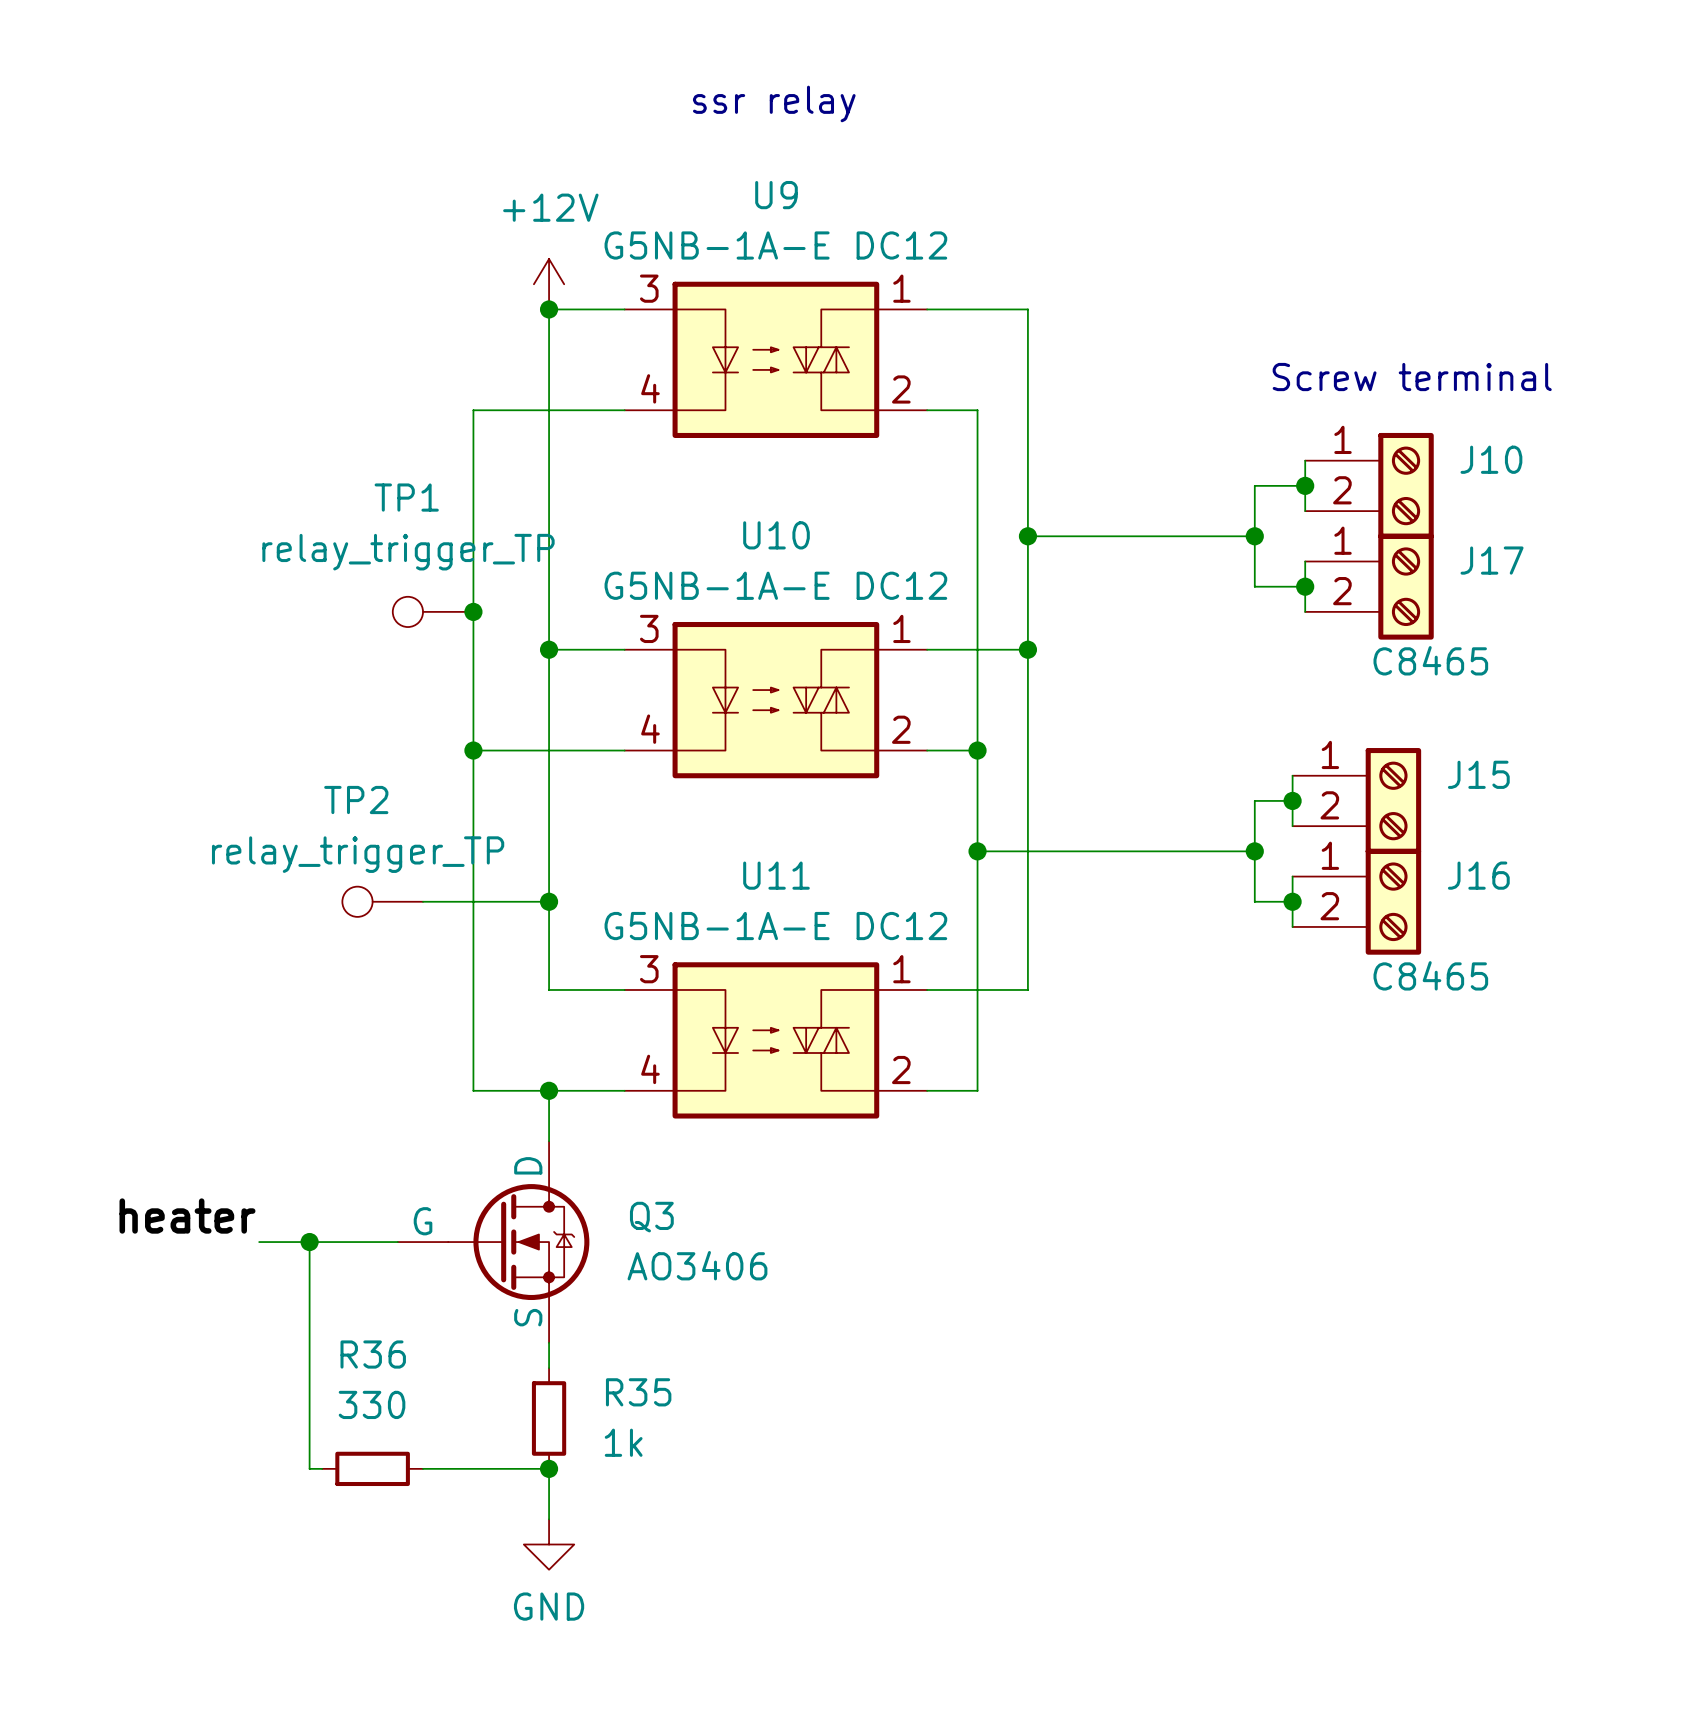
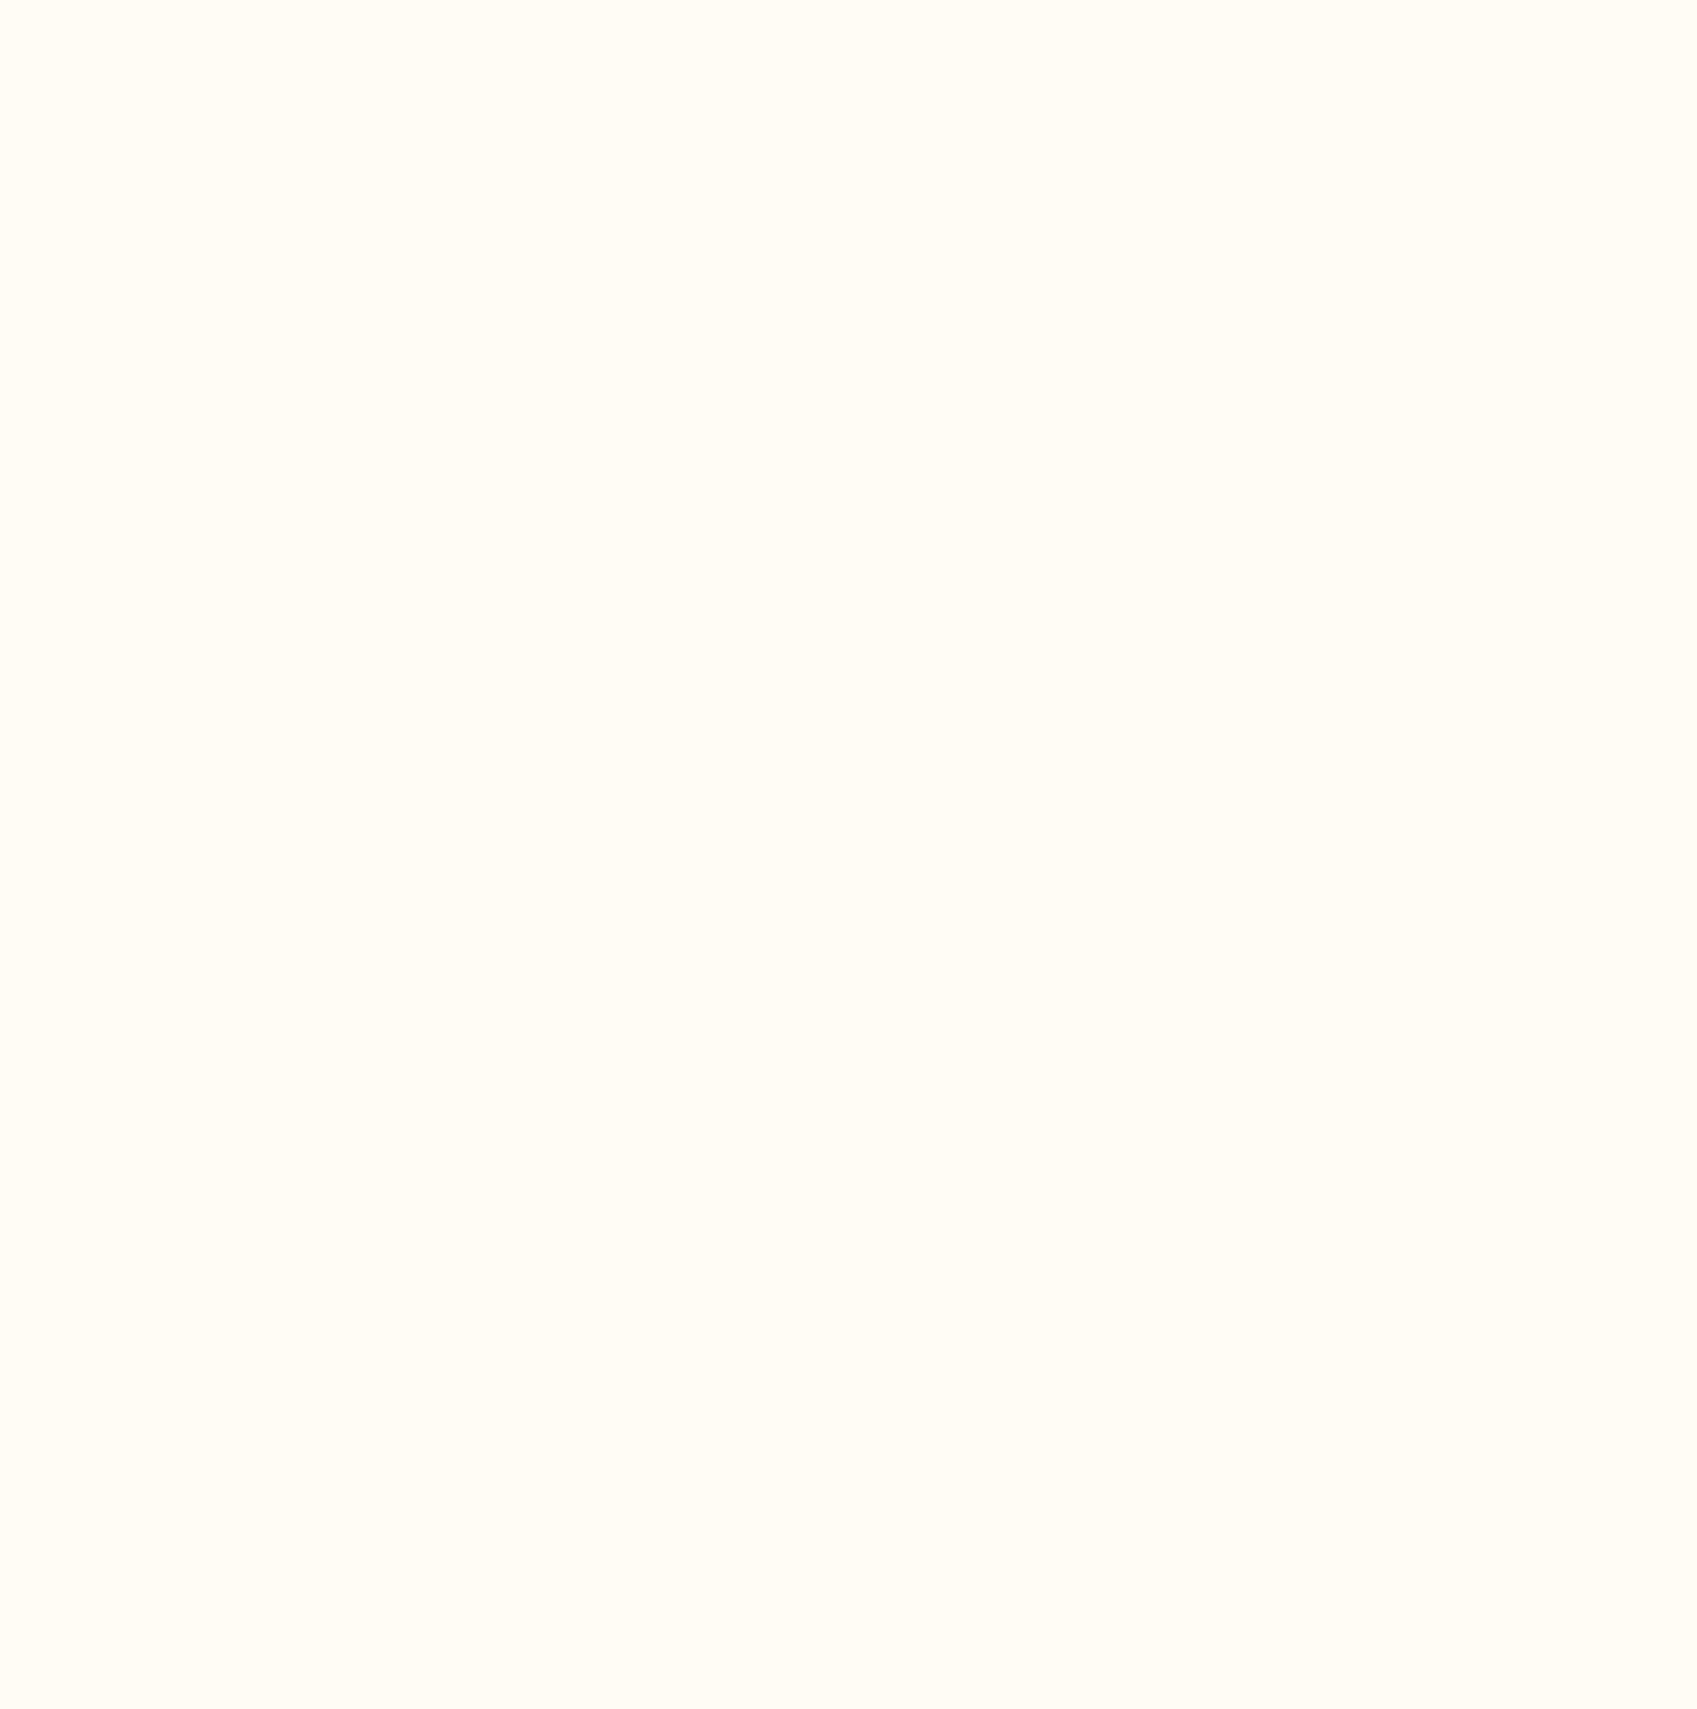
text: ssr relay (774, 103) -> none
power symbol: +12V (549, 284) -> none
junction: (549, 309) -> none
wire: (624, 309) (549, 309) (549, 989) (624, 989) -> none
wire: (927, 309) (1027, 309) (1027, 989) (927, 989) -> none
U9: G5NB-1A-E DC12 (775, 359) -> none
text: Screw terminal (1412, 377) -> none
wire: (624, 410) (473, 410) (473, 1090) (624, 1090) -> none
wire: (927, 410) (977, 410) (977, 1090) (927, 1090) -> none
wire: (1305, 460) (1305, 511) -> none
wire: (1305, 485) (1254, 485) (1254, 586) (1305, 586) -> none
junction: (1305, 485) -> none
J10: C8465 (1369, 485) -> none
wire: (1027, 536) (1254, 536) -> none
junction: (1027, 536) -> none
junction: (1254, 536) -> none
wire: (1305, 561) (1305, 611) -> none
junction: (1305, 586) -> none
J17: (1369, 586) -> none
TP1: relay_trigger_TP (433, 611) -> none
junction: (473, 611) -> none
wire: (549, 649) (624, 649) -> none
junction: (549, 649) -> none
wire: (927, 649) (1027, 649) -> none
junction: (1027, 649) -> none
U10: G5NB-1A-E DC12 (775, 700) -> none
wire: (473, 750) (624, 750) -> none
junction: (473, 750) -> none
wire: (927, 750) (977, 750) -> none
junction: (977, 750) -> none
wire: (1292, 775) (1292, 826) -> none
wire: (1292, 800) (1254, 800) (1254, 901) (1292, 901) -> none
junction: (1292, 800) -> none
J15: C8465 (1356, 800) -> none
wire: (977, 851) (1254, 851) -> none
junction: (977, 851) -> none
junction: (1254, 851) -> none
wire: (1292, 876) (1292, 926) -> none
TP2: relay_trigger_TP (382, 901) -> none
wire: (423, 901) (549, 901) -> none
junction: (549, 901) -> none
junction: (1292, 901) -> none
J16: (1356, 901) -> none
U11: G5NB-1A-E DC12 (775, 1040) -> none
wire: (549, 1090) (549, 1141) -> none
junction: (549, 1090) -> none
label: heater (187, 1216) -> none
wire: (259, 1242) (397, 1242) -> none
wire: (309, 1242) (309, 1468) (322, 1468) -> none
junction: (309, 1242) -> none
Q3: AO3406 (493, 1242) -> none
wire: (549, 1342) (549, 1368) -> none
R35: 1k (549, 1418) -> none
R36: 330 (372, 1468) -> none
wire: (423, 1468) (549, 1468) (549, 1519) -> none
junction: (549, 1468) -> none
power symbol: GND (549, 1544) -> none

